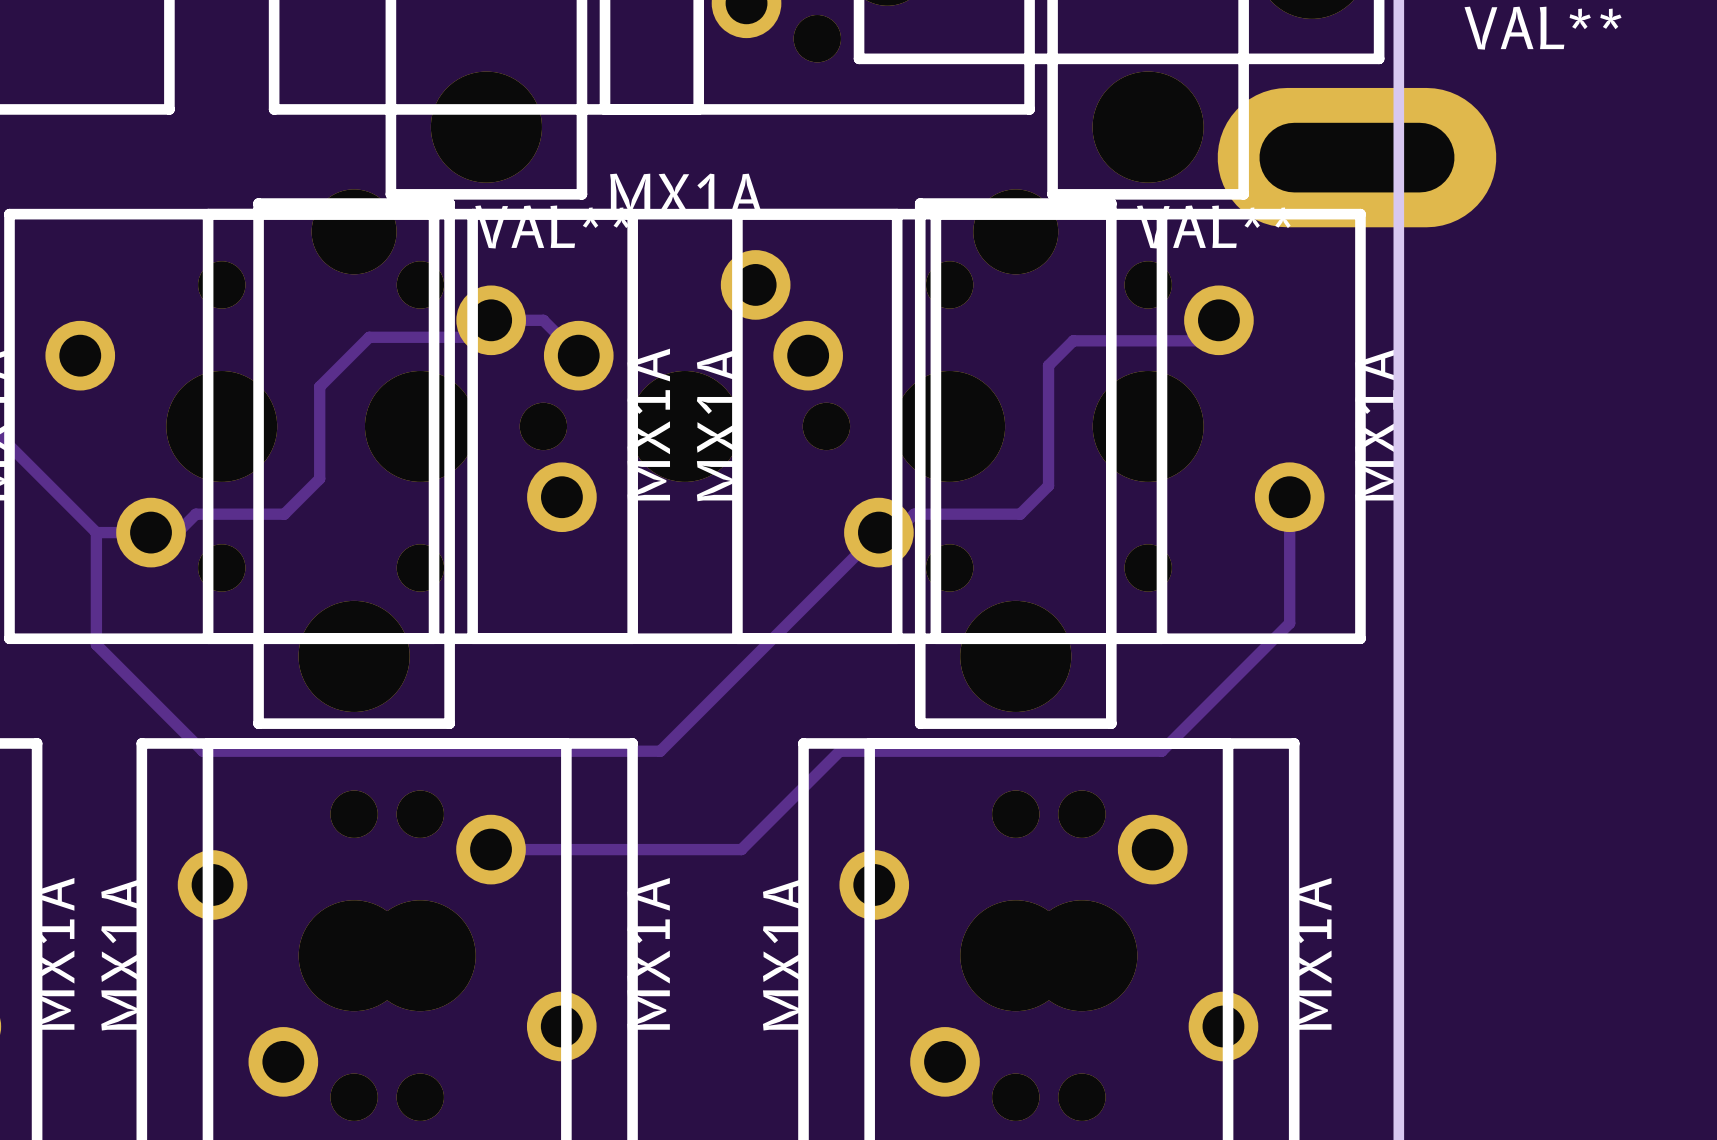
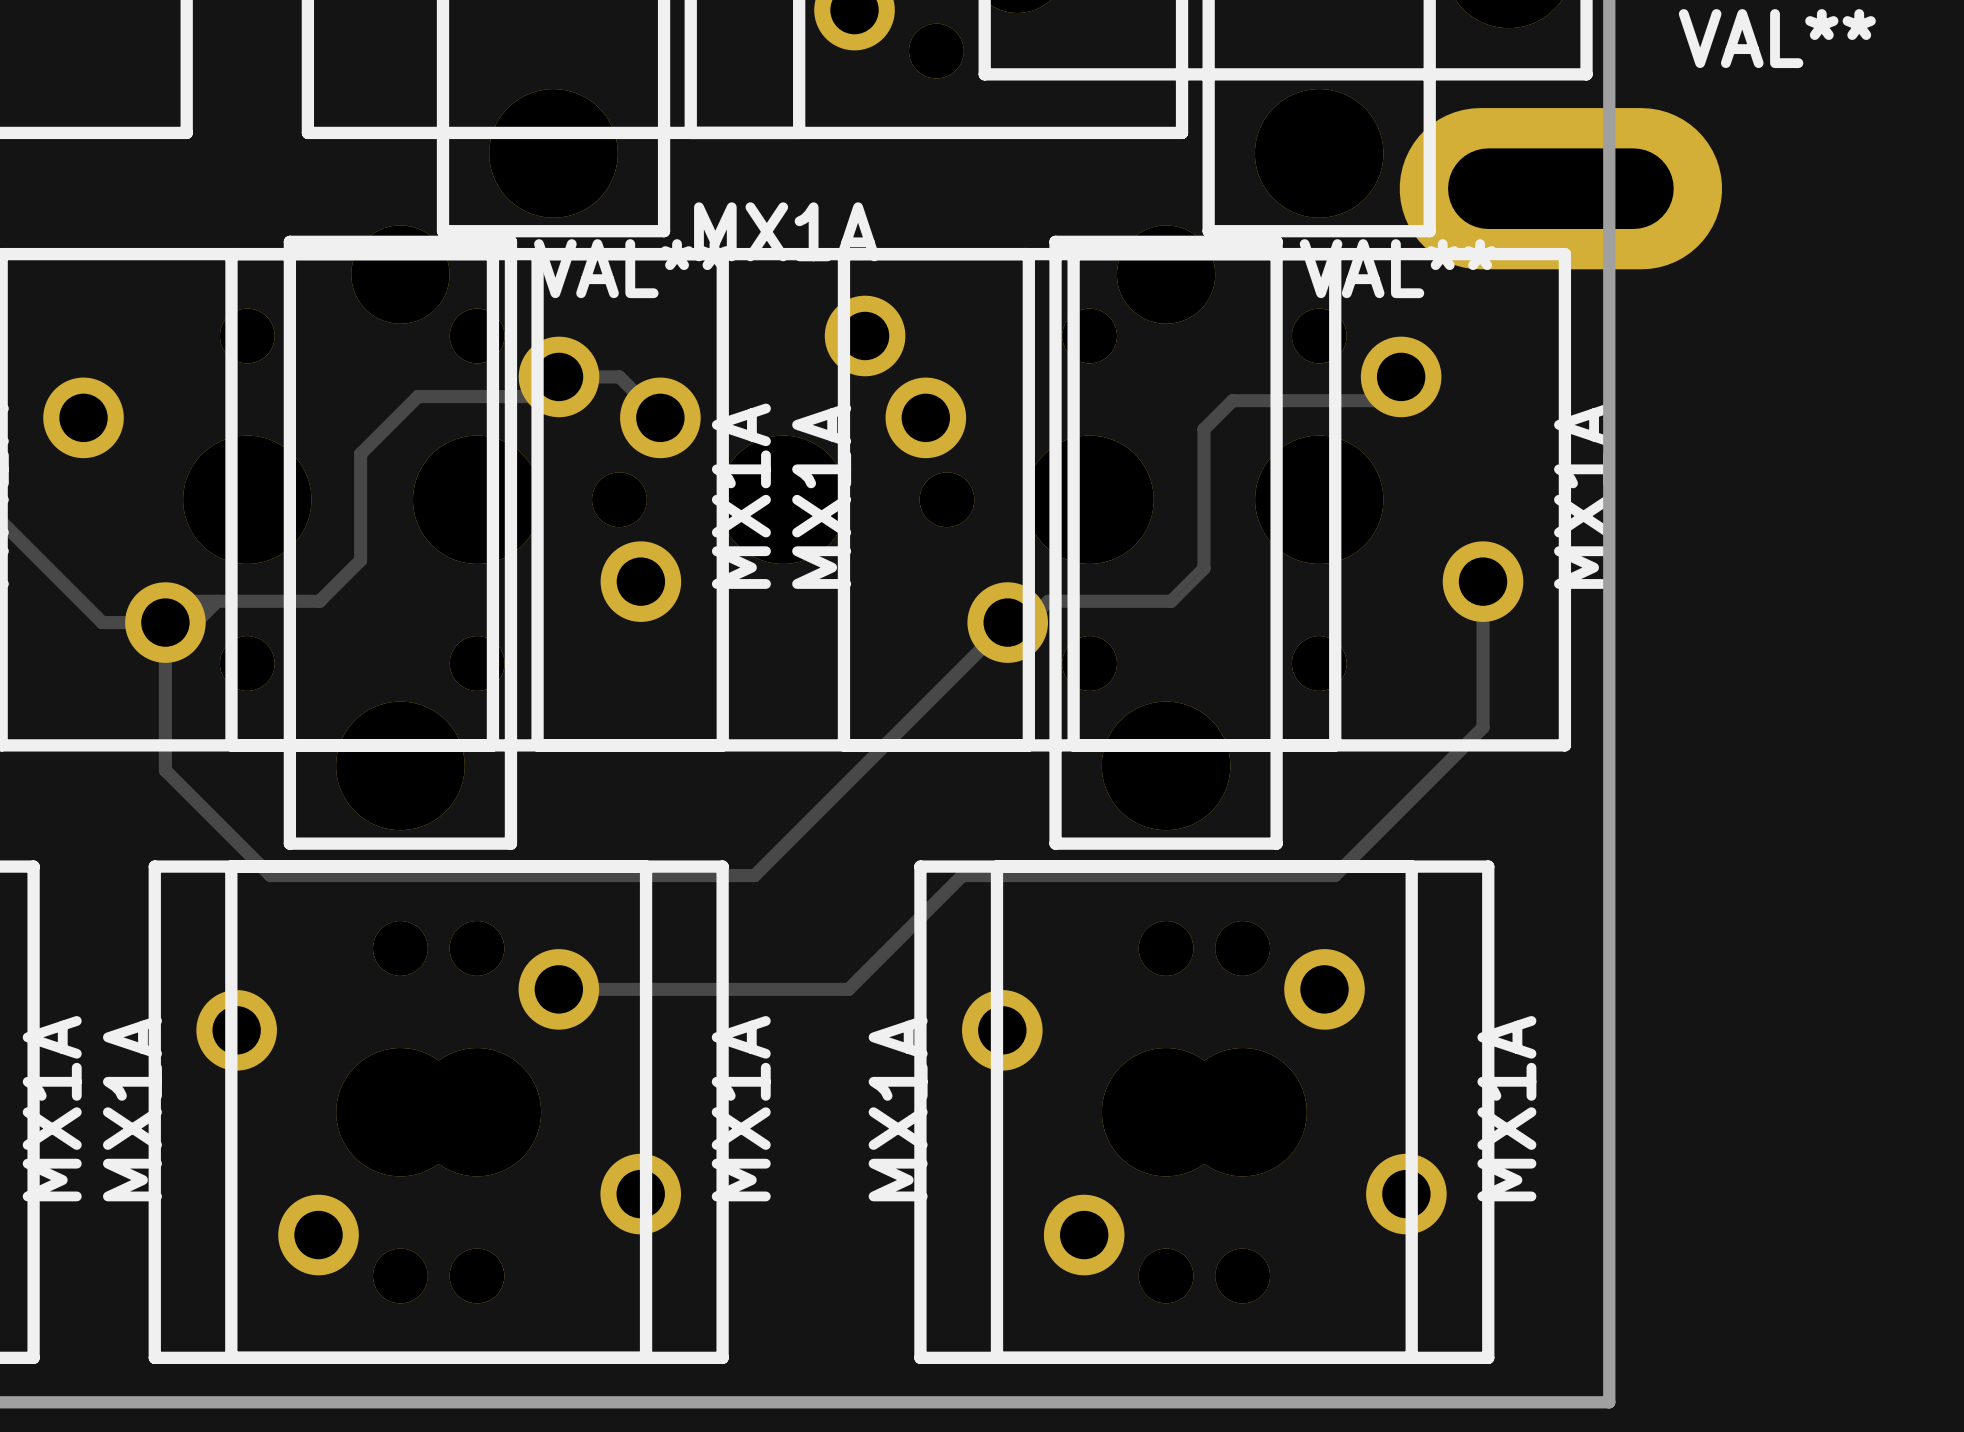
track: (96, 532) (96, 644) (202, 751) (241, 751) -> (217, 601) (186, 601) (165, 622) (165, 770) (270, 875)

